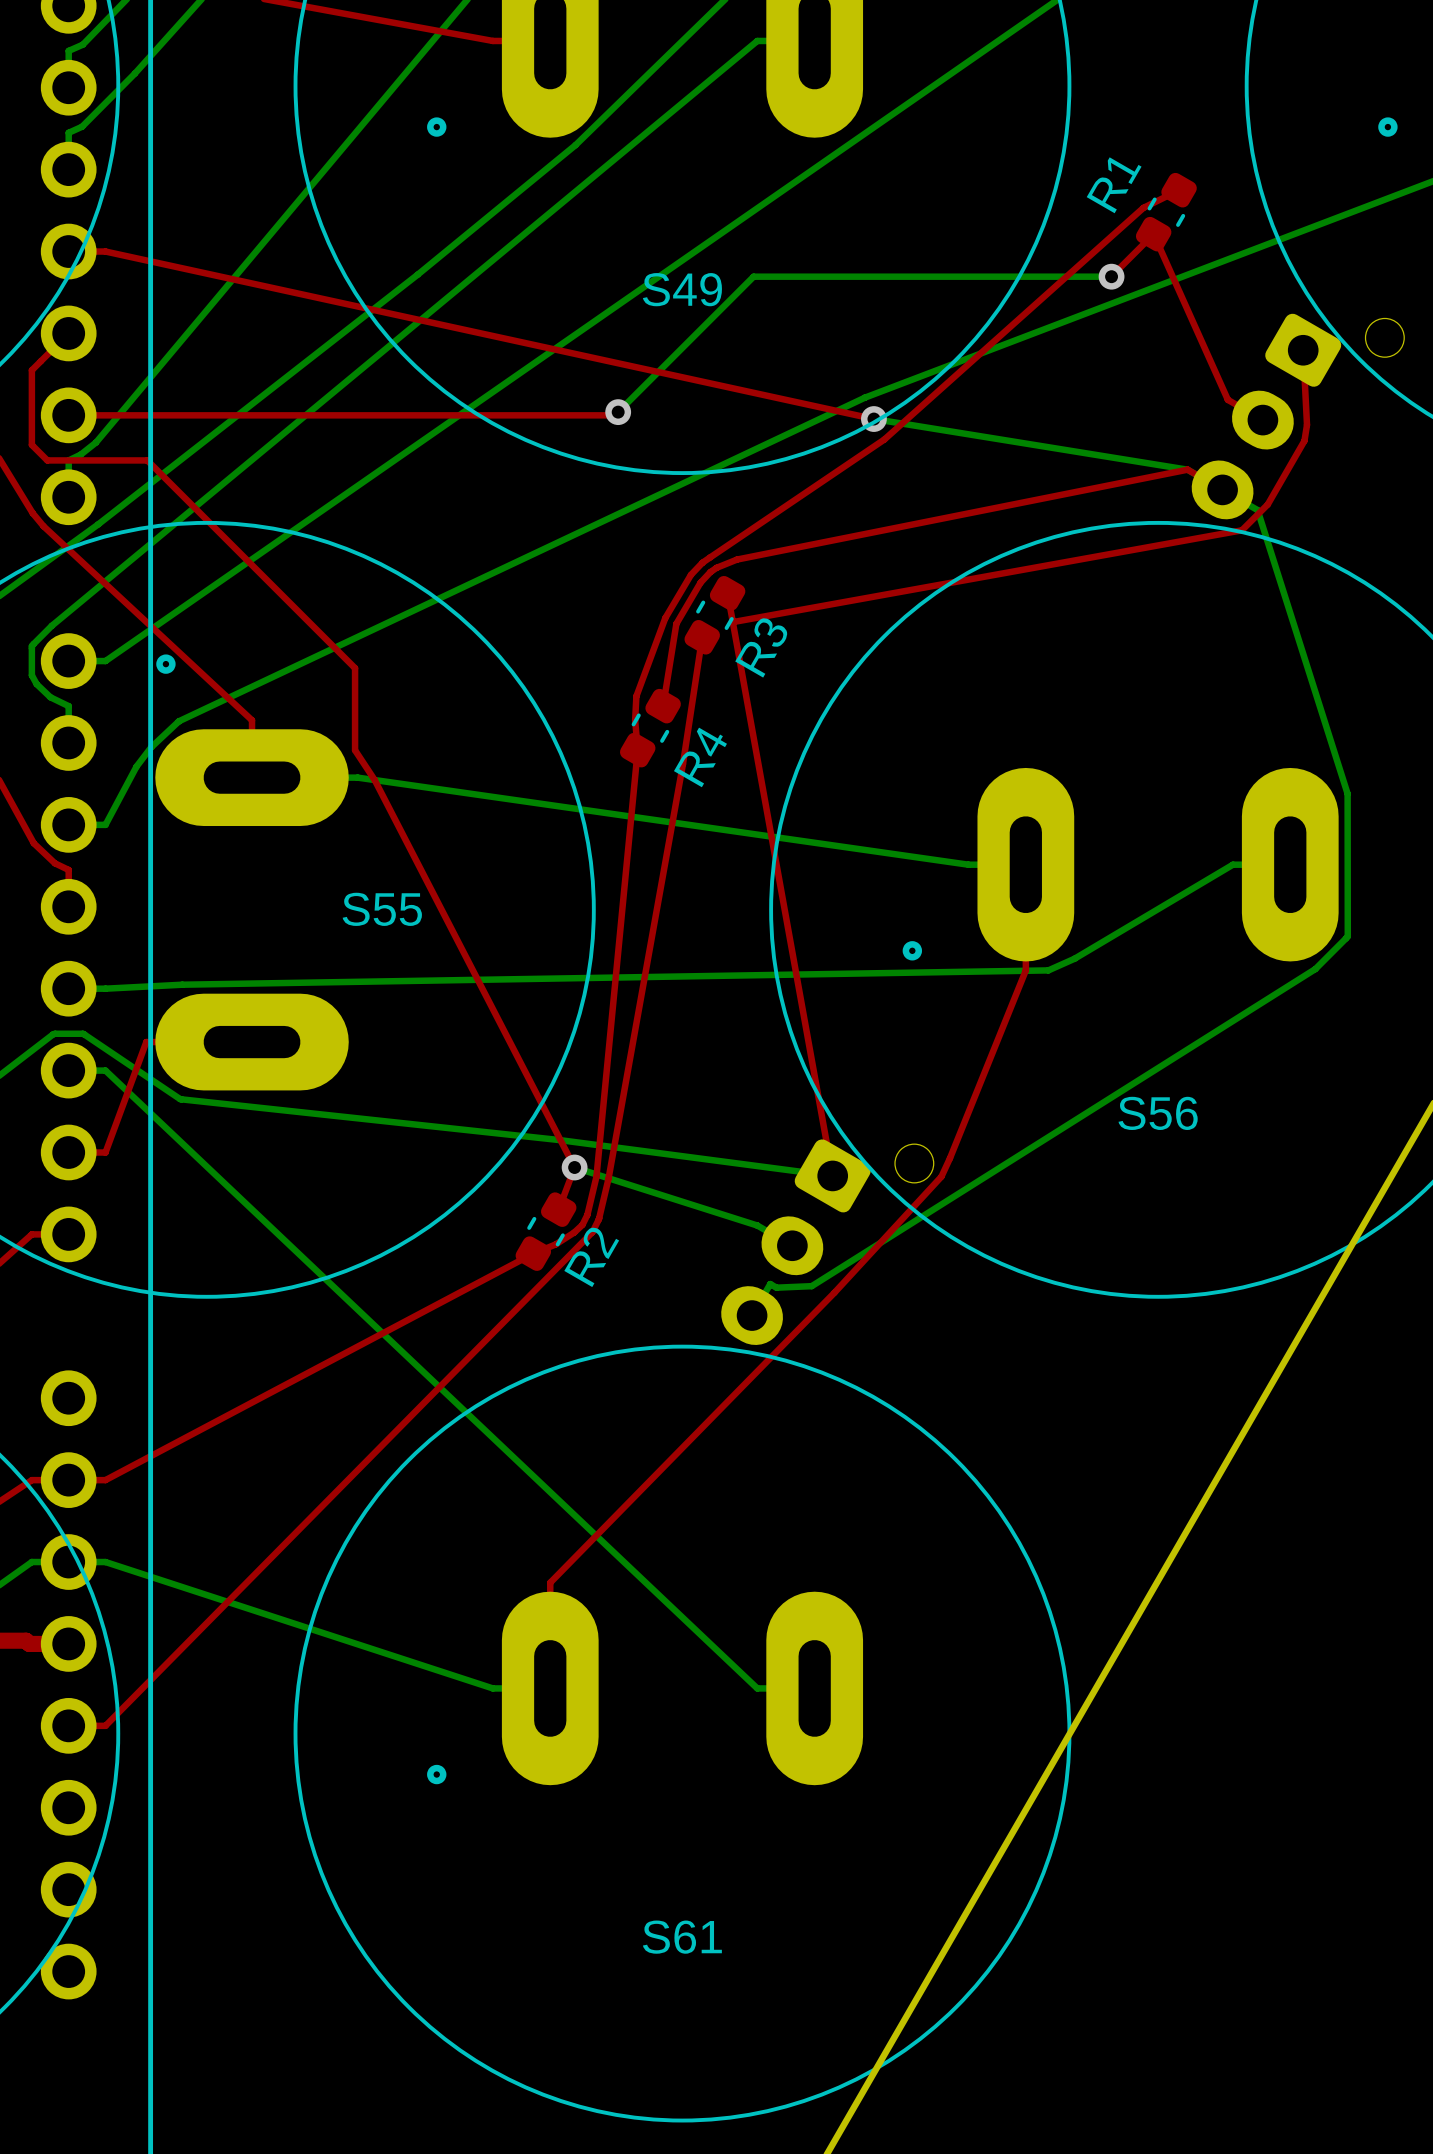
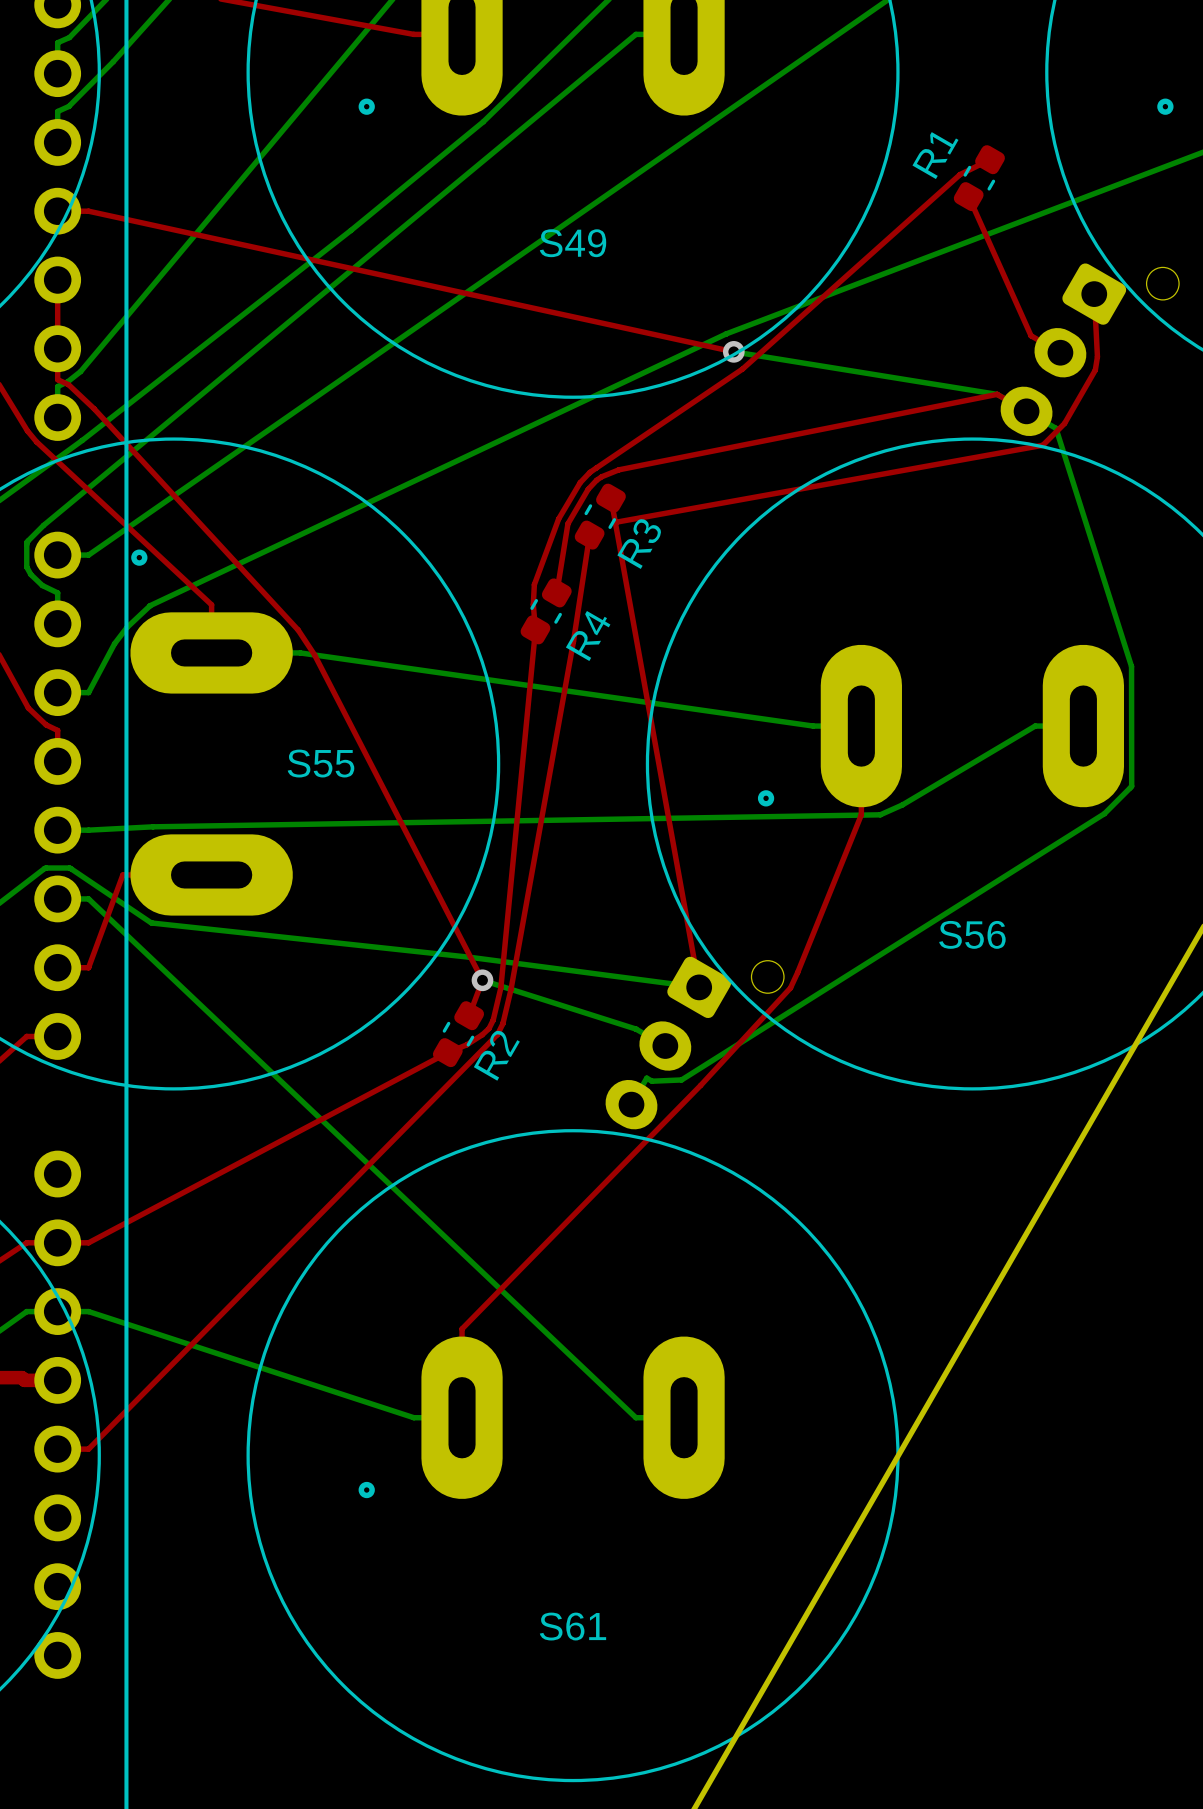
top track: (1153, 234) (1111, 276) -> none
bottom track: (1111, 276) (753, 276) (618, 412) -> none
via: (1111, 276) -> none
top track: (68, 333) (31, 370) (31, 444) (47, 460) (147, 460) (355, 668) (355, 750) -> (57, 279) (57, 379) (68, 384) (94, 408) (298, 629)
top track: (618, 412) (614, 415) (68, 415) -> none
via: (618, 412) -> none

